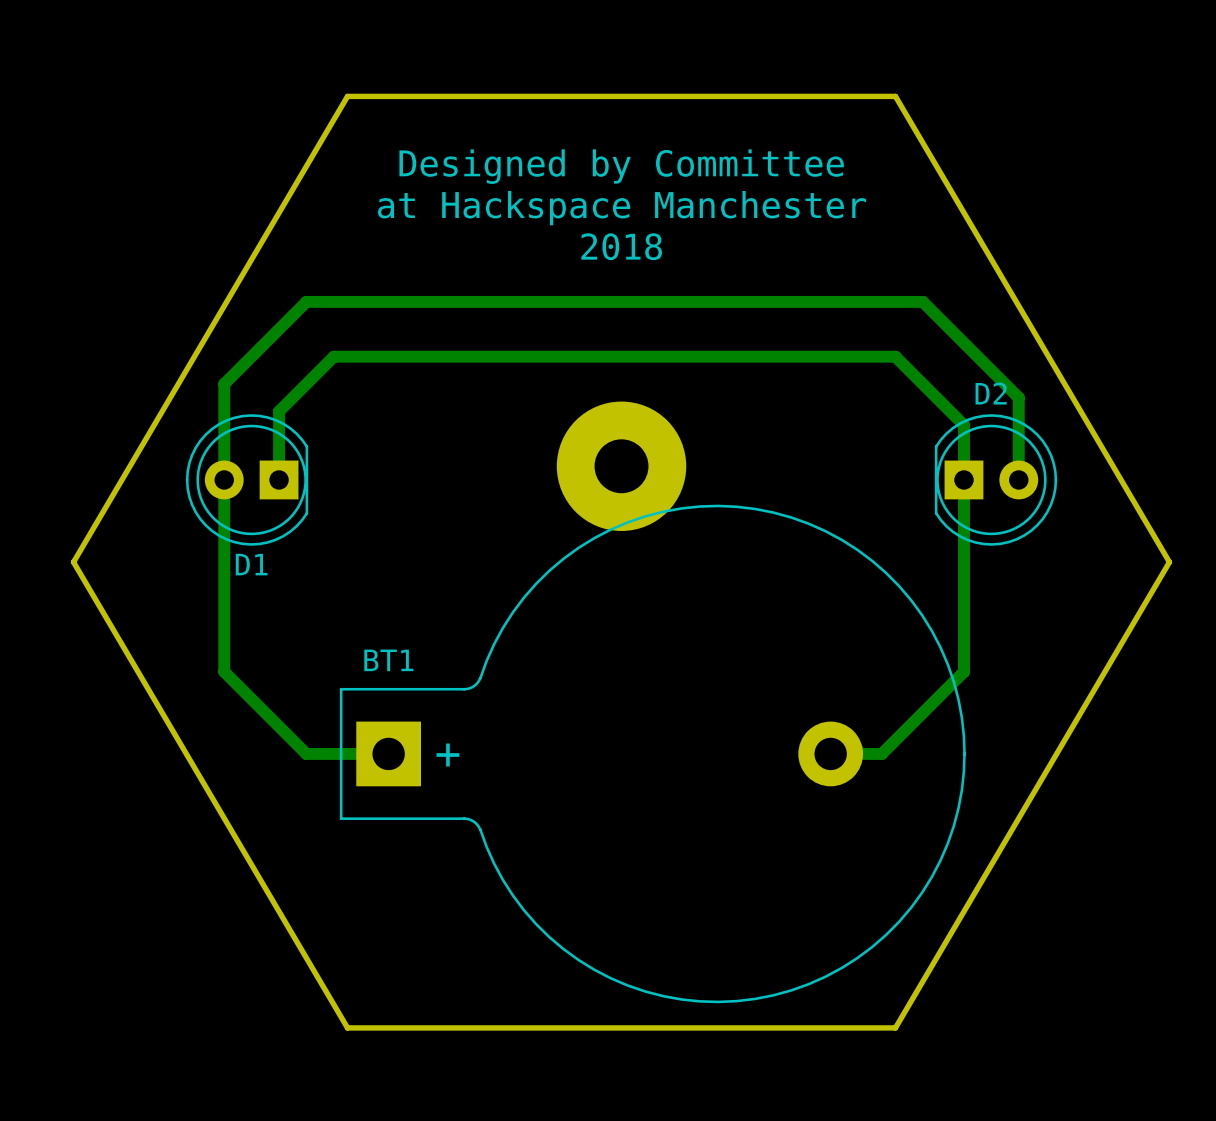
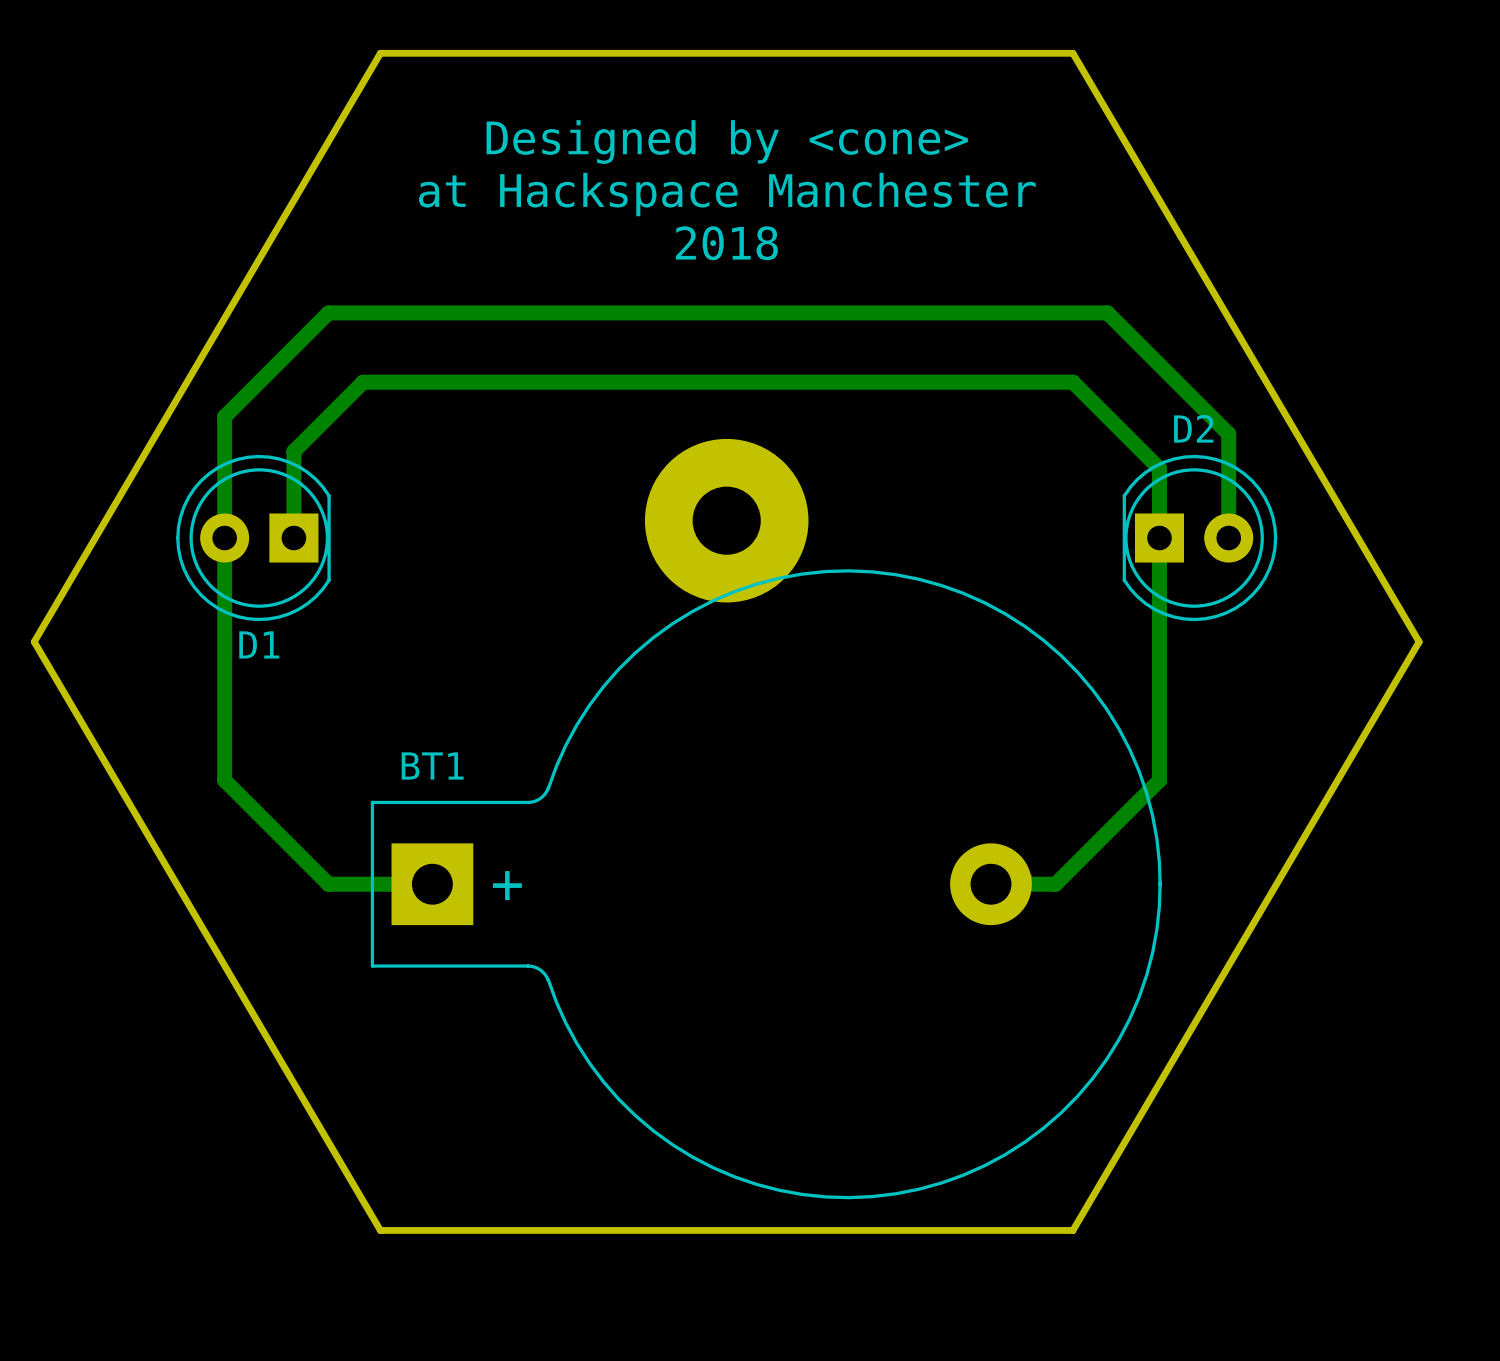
text: Designed by Committee (621, 166) -> Designed by <cone> (727, 142)

